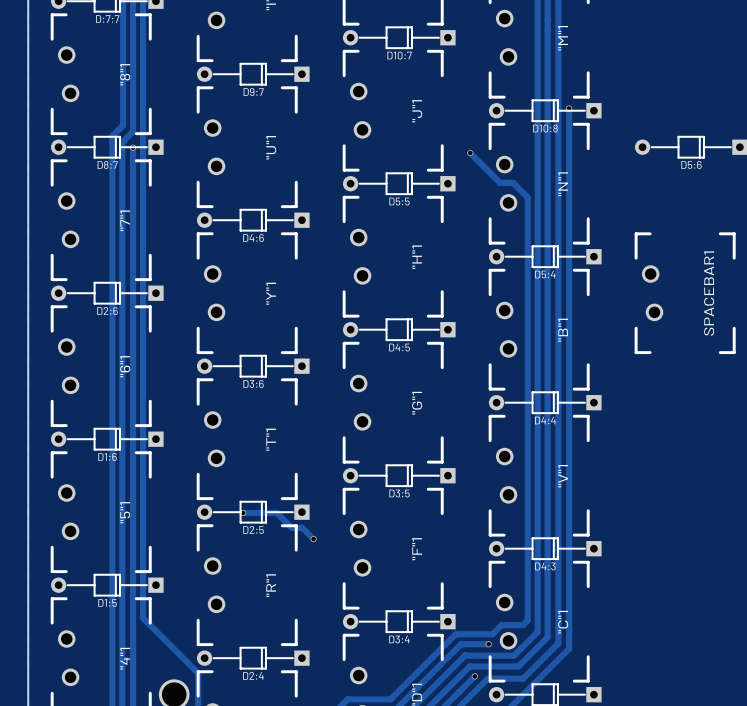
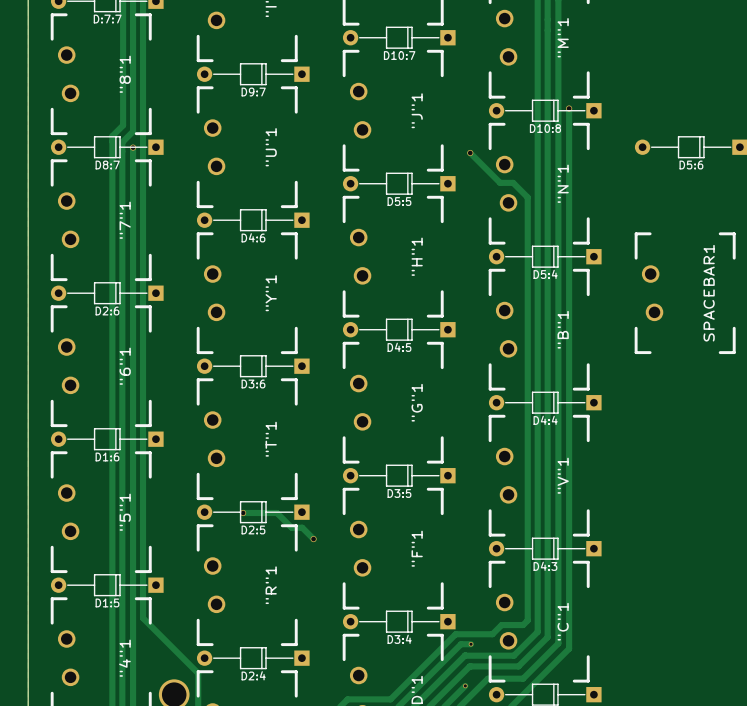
track: (471, 644) (488, 644) -> none
via: none -> (471, 644)
via: (488, 644) -> none
track: (474, 676) (465, 685) -> none
via: (474, 676) -> none
via: none -> (465, 685)

